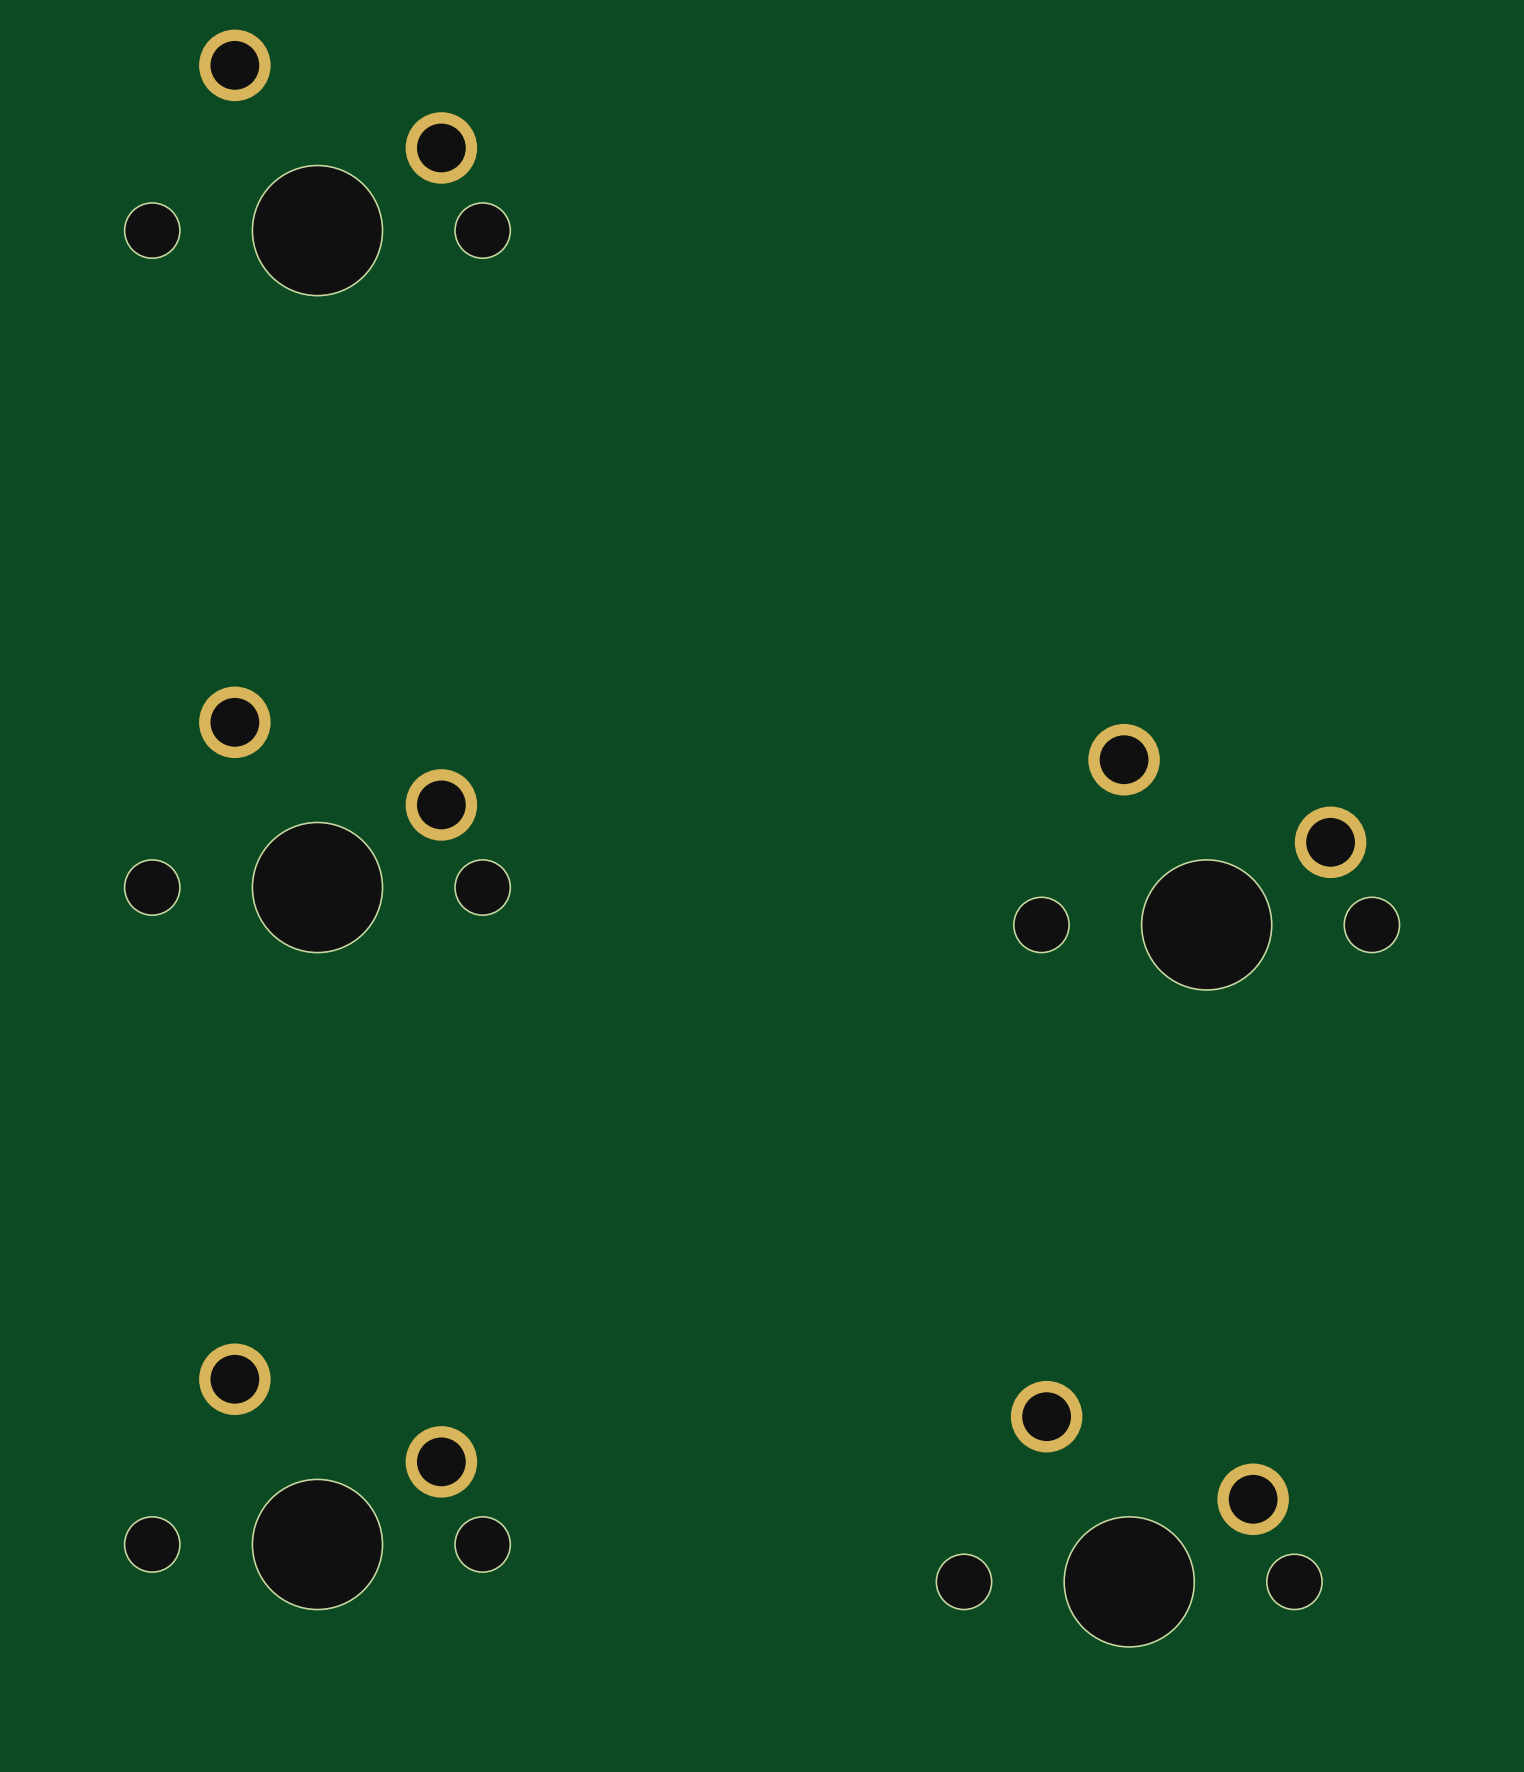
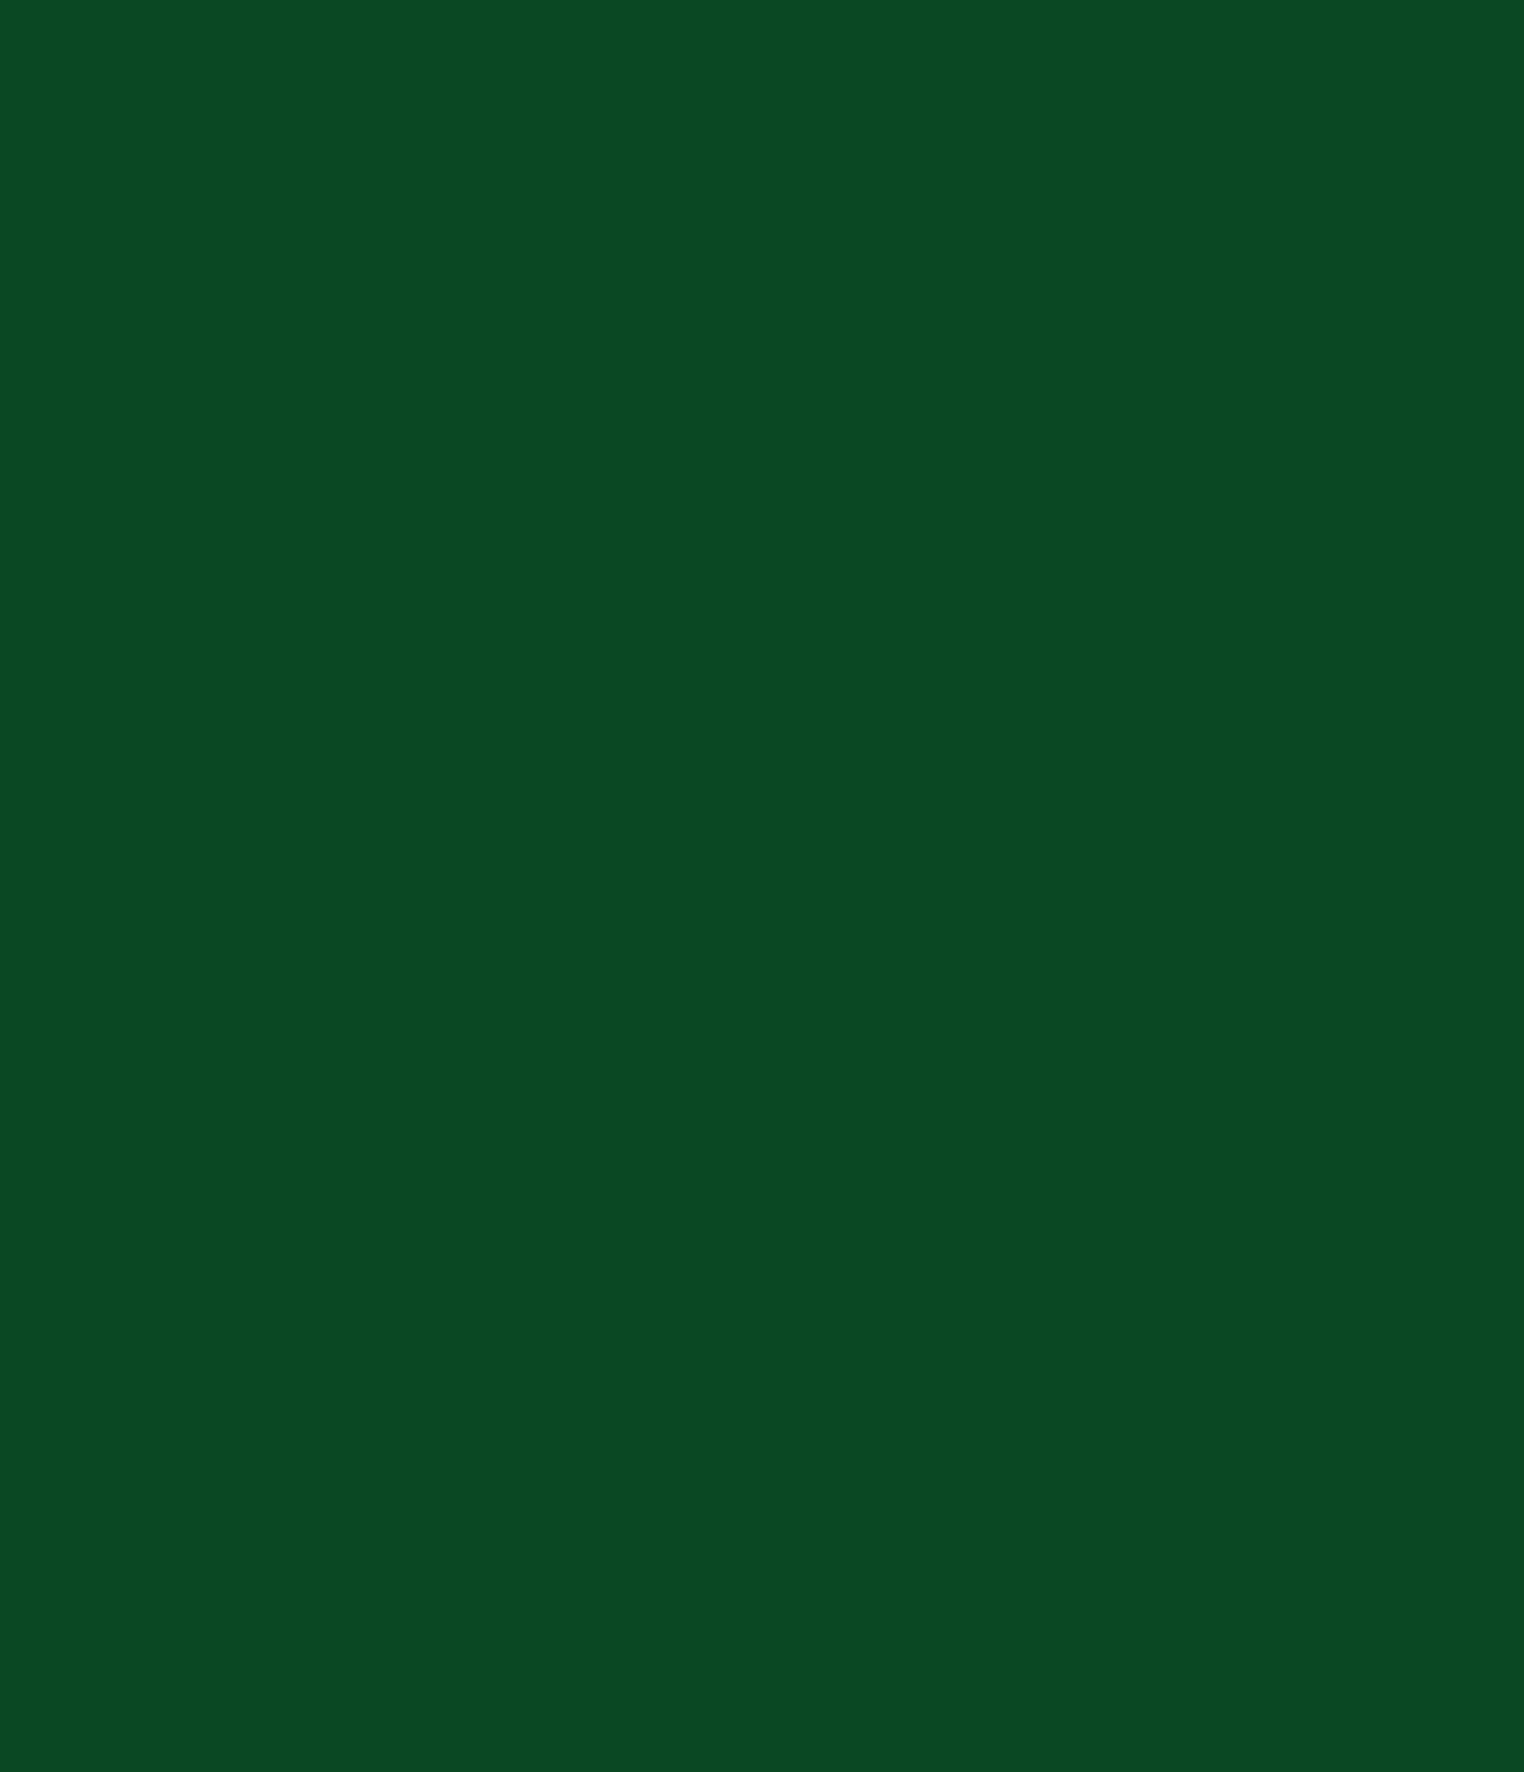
part: (317, 162) -> none
part: (317, 819) -> none
part: (1206, 856) -> none
part: (317, 1476) -> none
part: (1129, 1513) -> none

